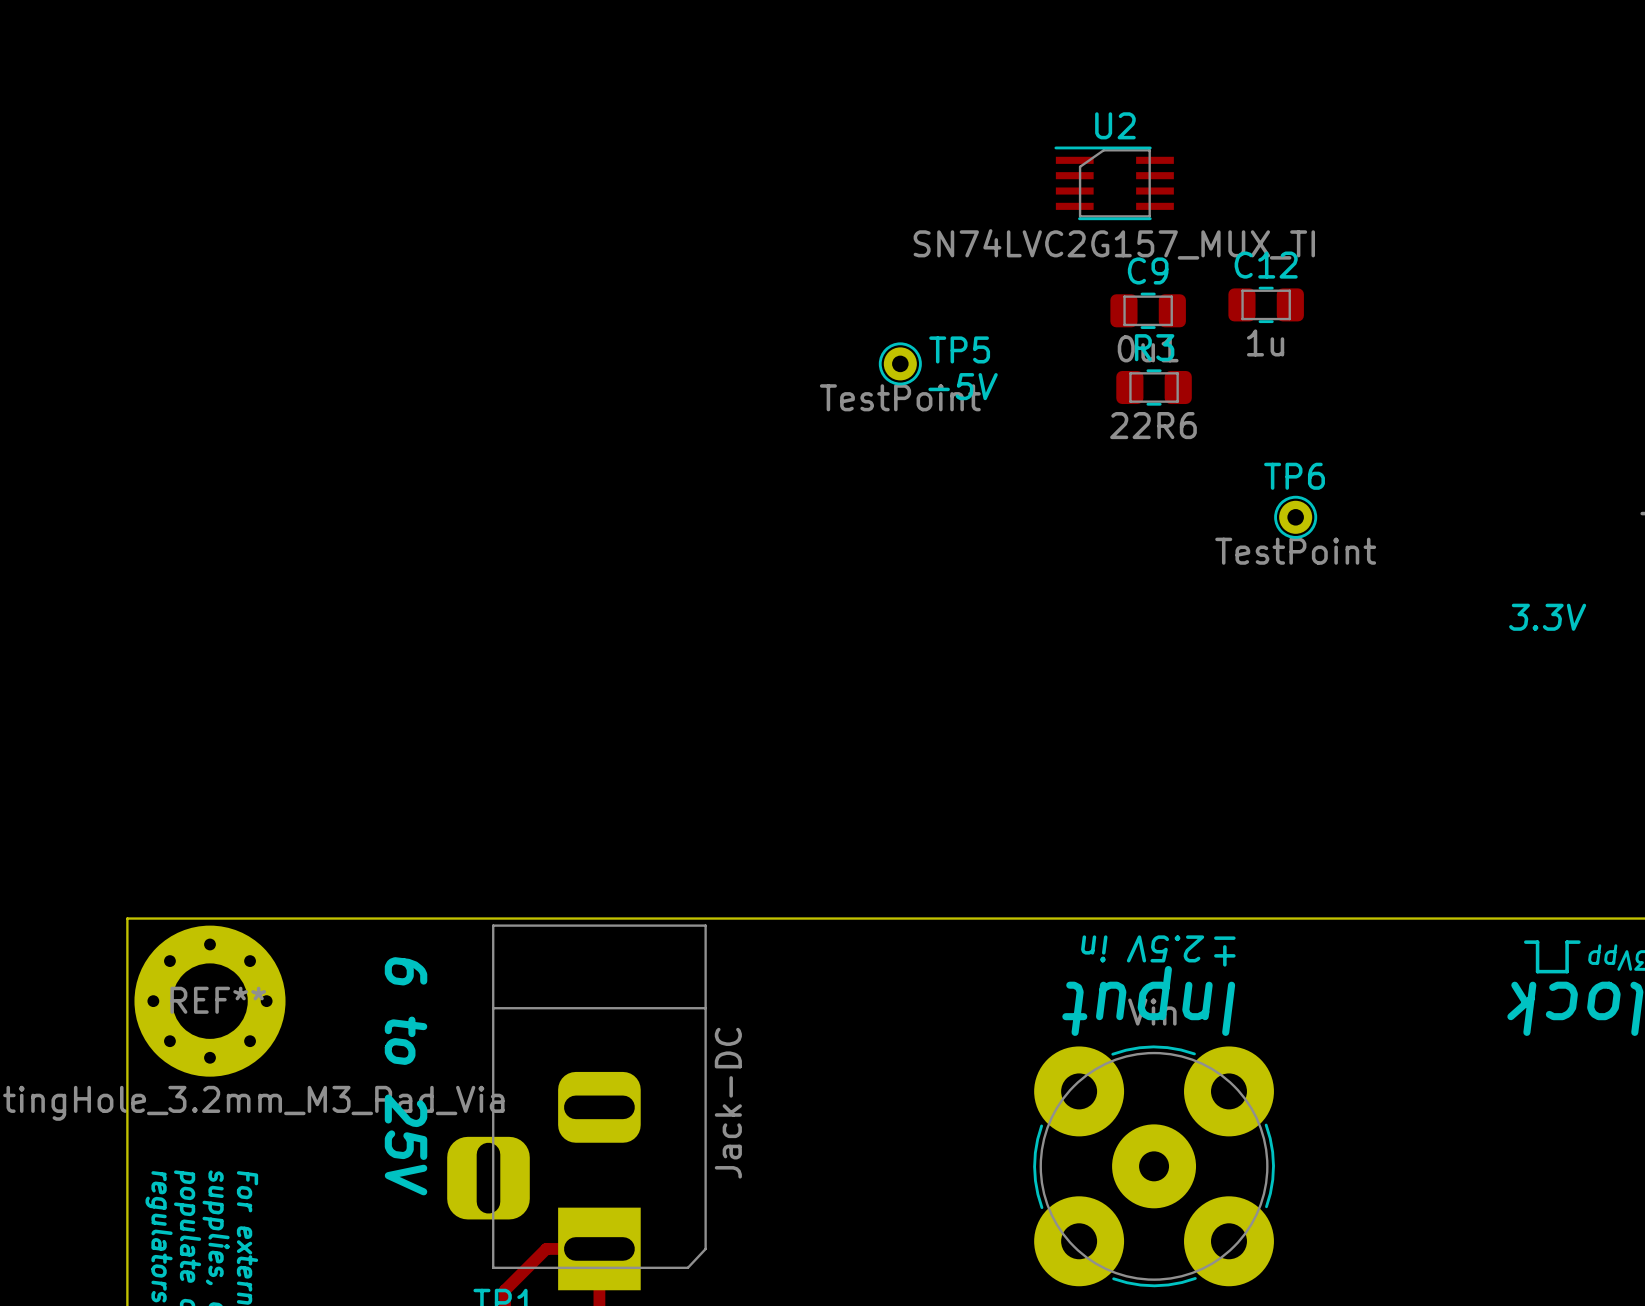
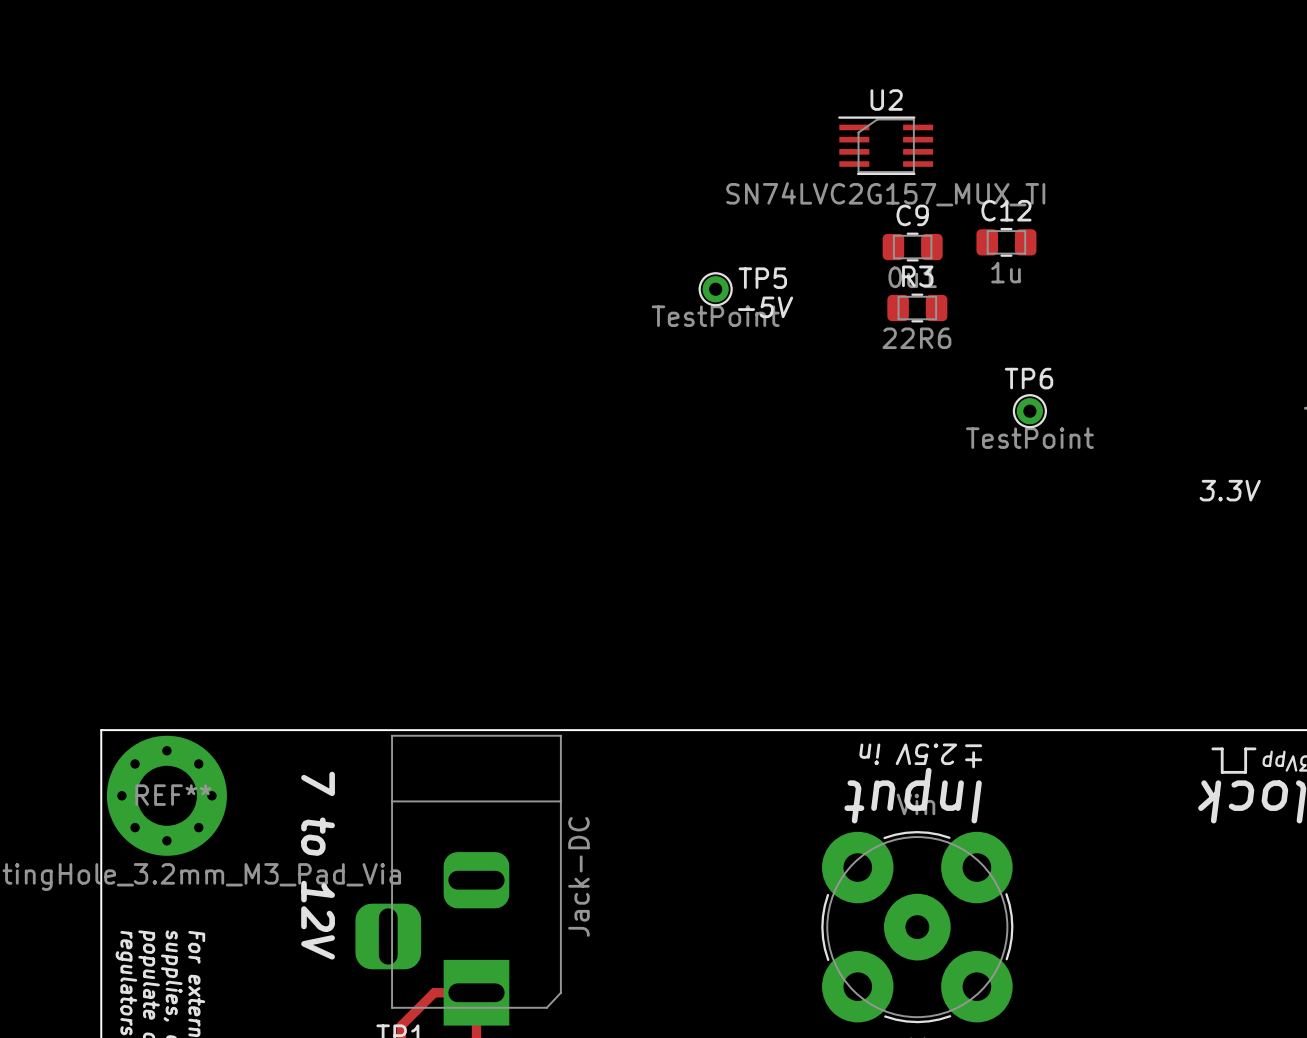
text: 6 to 25V (406, 1076) -> 7 to 12V (318, 865)

